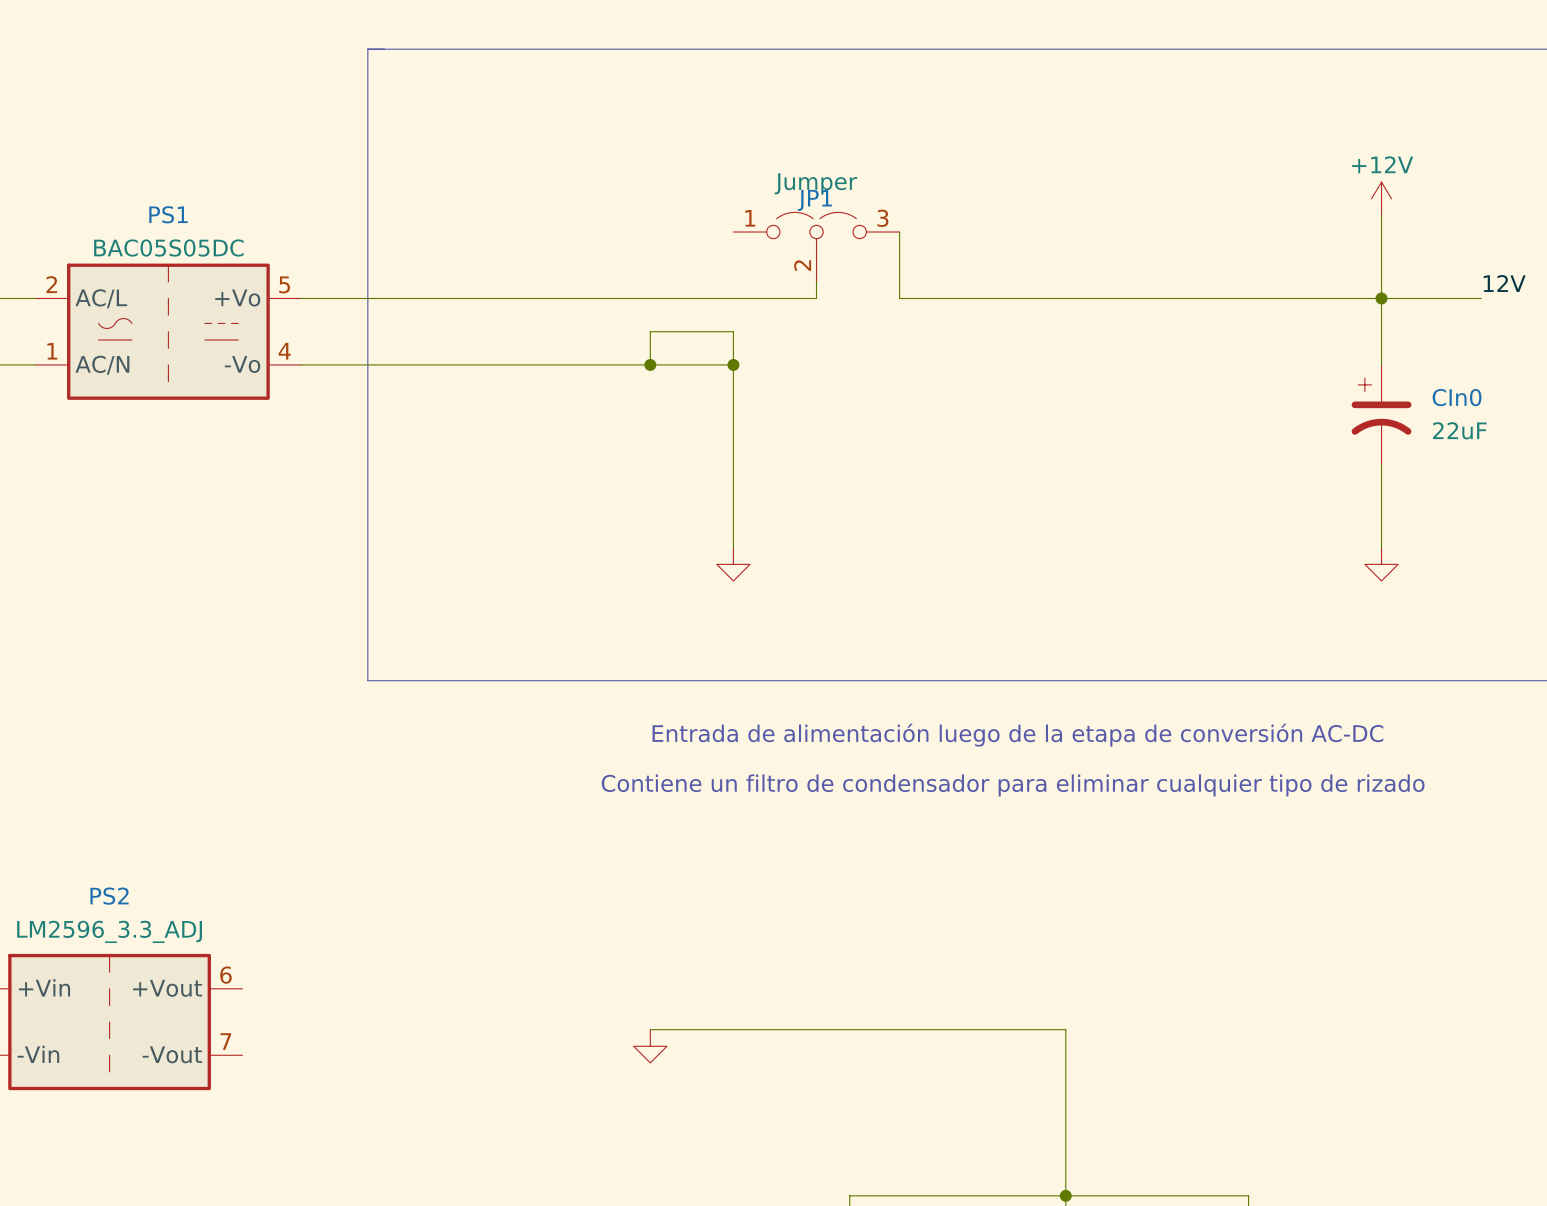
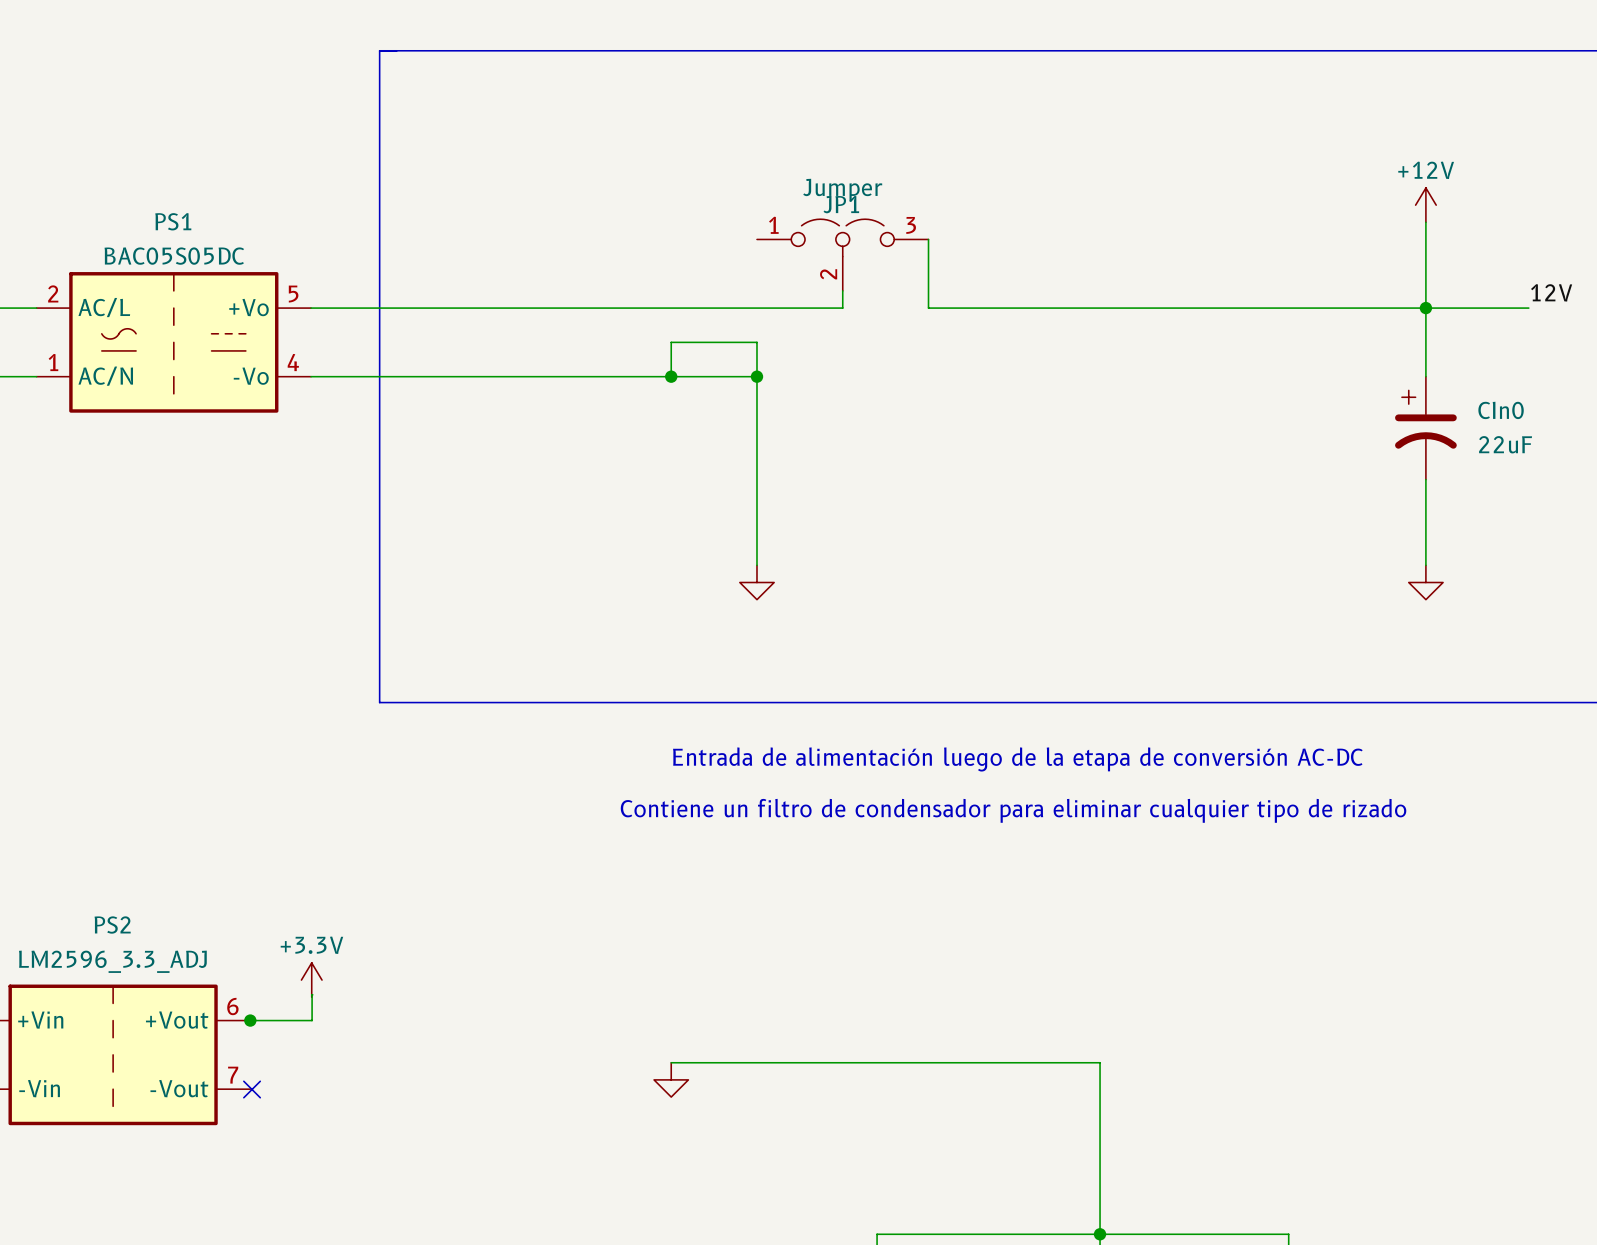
power symbol: none -> +3.3V (311, 980)
wire: none -> (312, 994) (312, 1020) (249, 1020)
junction: none -> (250, 1020)
no-connect mark: none -> (252, 1089)

